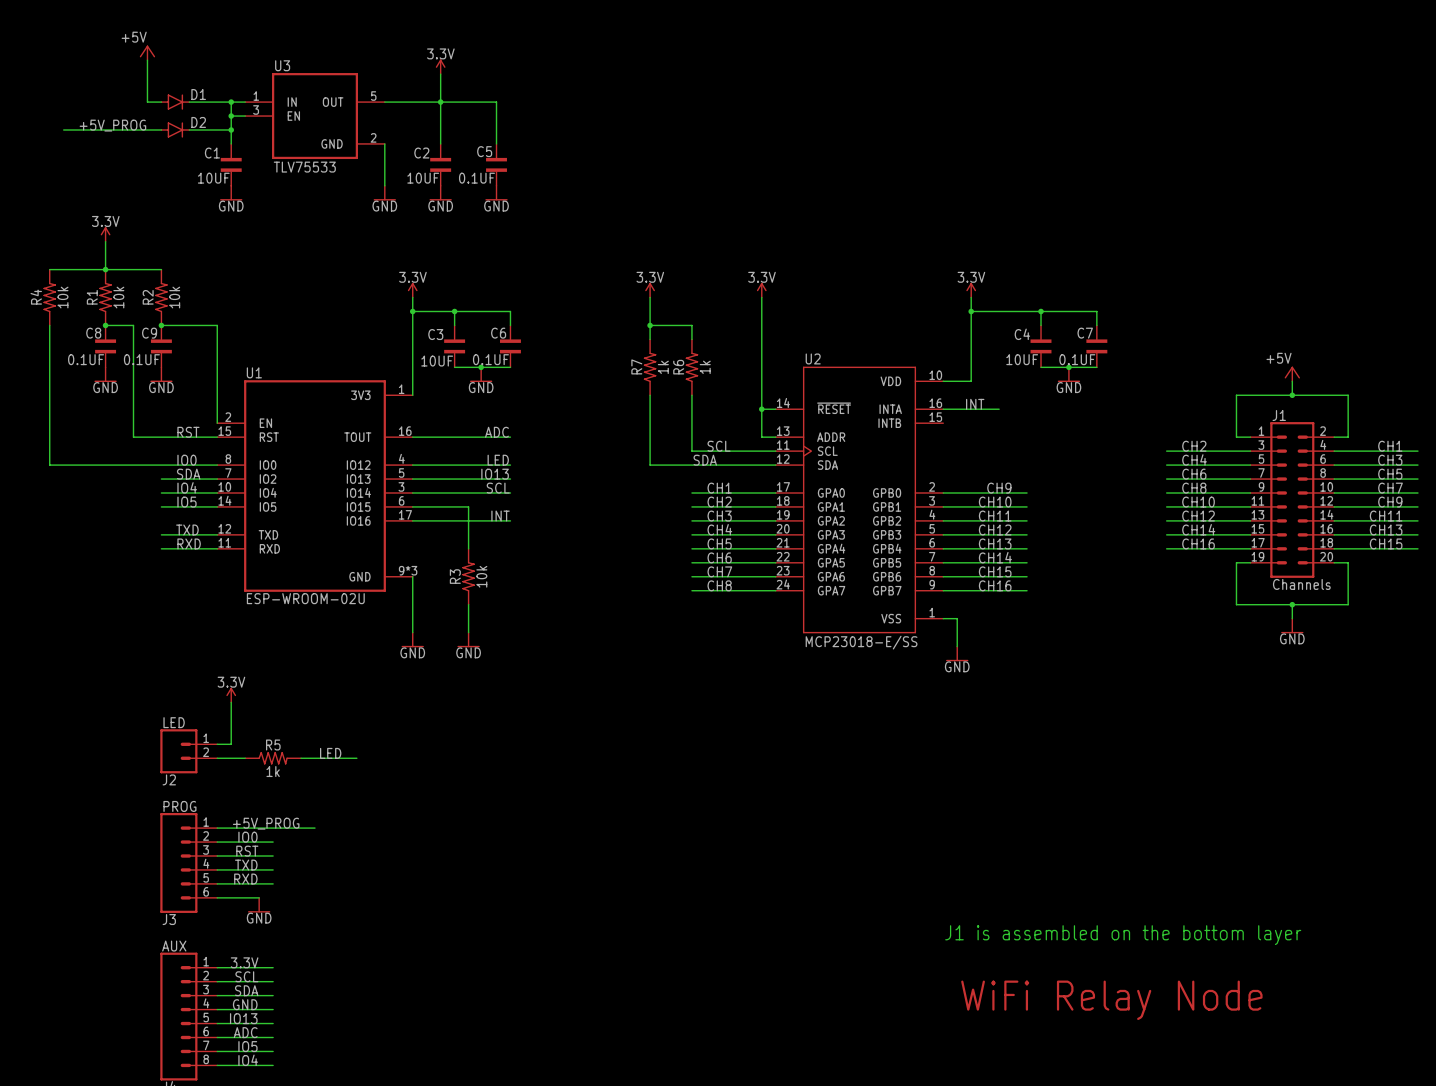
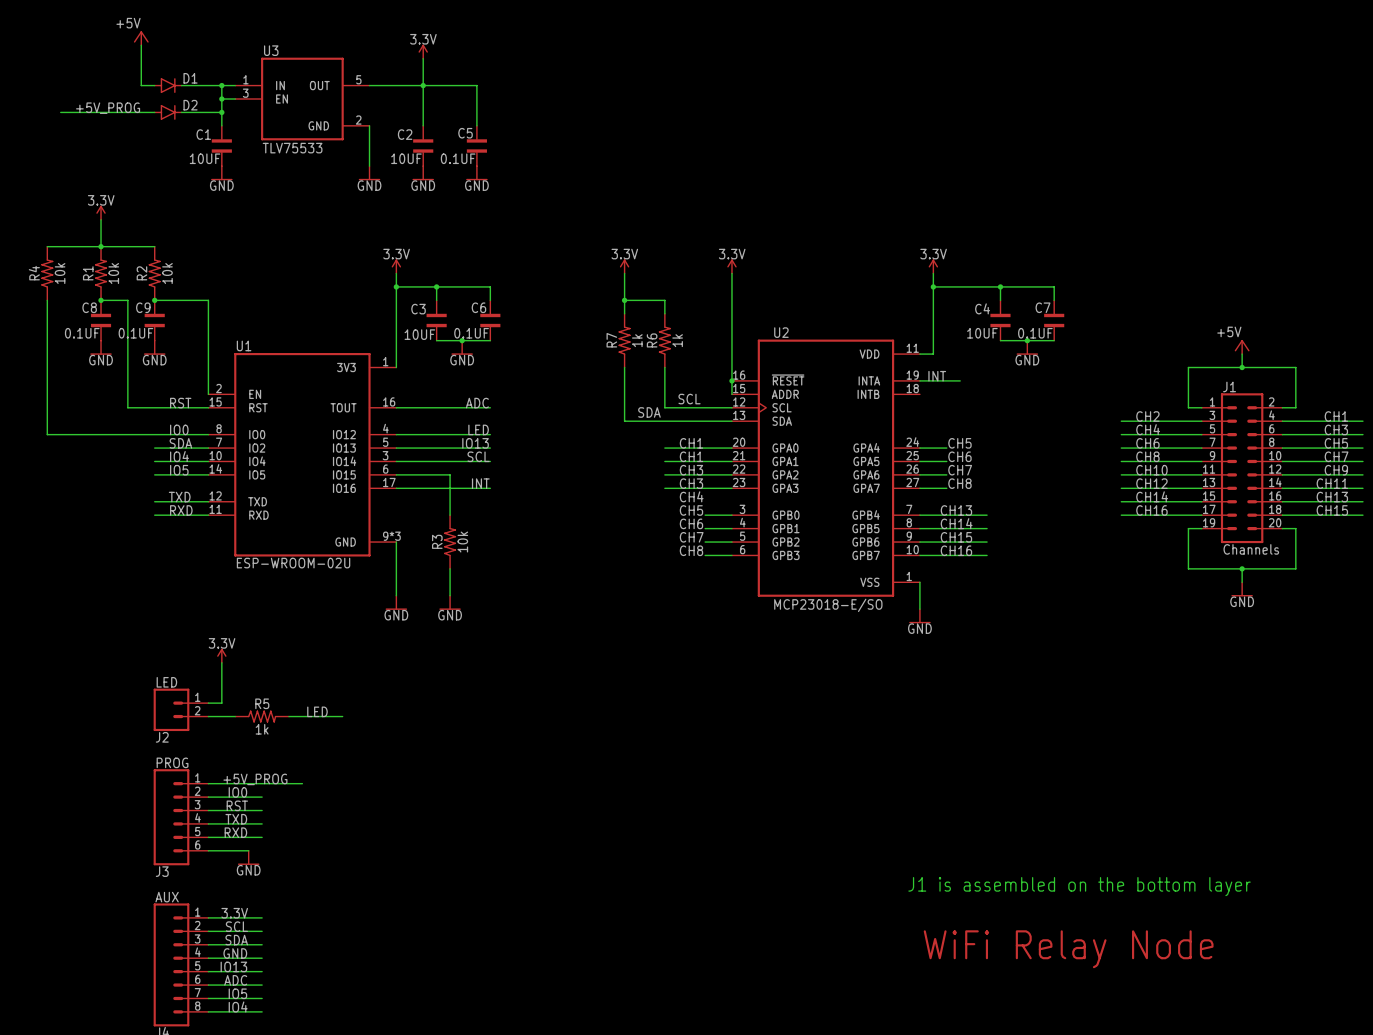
U2 symbol: [775, 366, 944, 634] -> [731, 339, 920, 597]
wire: (691, 437) (691, 451) -> (624, 421) (664, 421)
wire: none -> (664, 407) (731, 407)
label position: SCL (719, 446) -> SCL (689, 399)
wire: (650, 451) (650, 465) (775, 465) -> none
label position: SDA (705, 460) -> SDA (649, 412)
label: none -> CH1 (691, 443)
label: none -> CH5 (959, 443)
wire: none -> (664, 448) (731, 448)
wire: none -> (919, 448) (946, 448)
label: none -> CH6 (959, 456)
label: CH9 (999, 488) -> none
wire: (985, 493) (1027, 493) -> none
label: CH2 (719, 502) -> CH3 (691, 470)
label: CH10 (995, 502) -> none
label: none -> CH7 (960, 470)
wire: (985, 506) (1027, 506) -> none
label: CH11 (995, 516) -> none
label: none -> CH8 (959, 483)
wire: (985, 520) (1027, 520) -> none
label: CH12 (995, 529) -> none
wire: (691, 534) (775, 534) -> none
wire: (943, 534) (1027, 534) -> none
wire: (691, 548) (733, 548) -> none
wire: (691, 562) (733, 562) -> none
wire: (691, 576) (733, 576) -> none
wire: (691, 590) (733, 590) -> none
U2 value: MCP23018-E/SS (861, 642) -> MCP23018-E/SO (828, 605)

